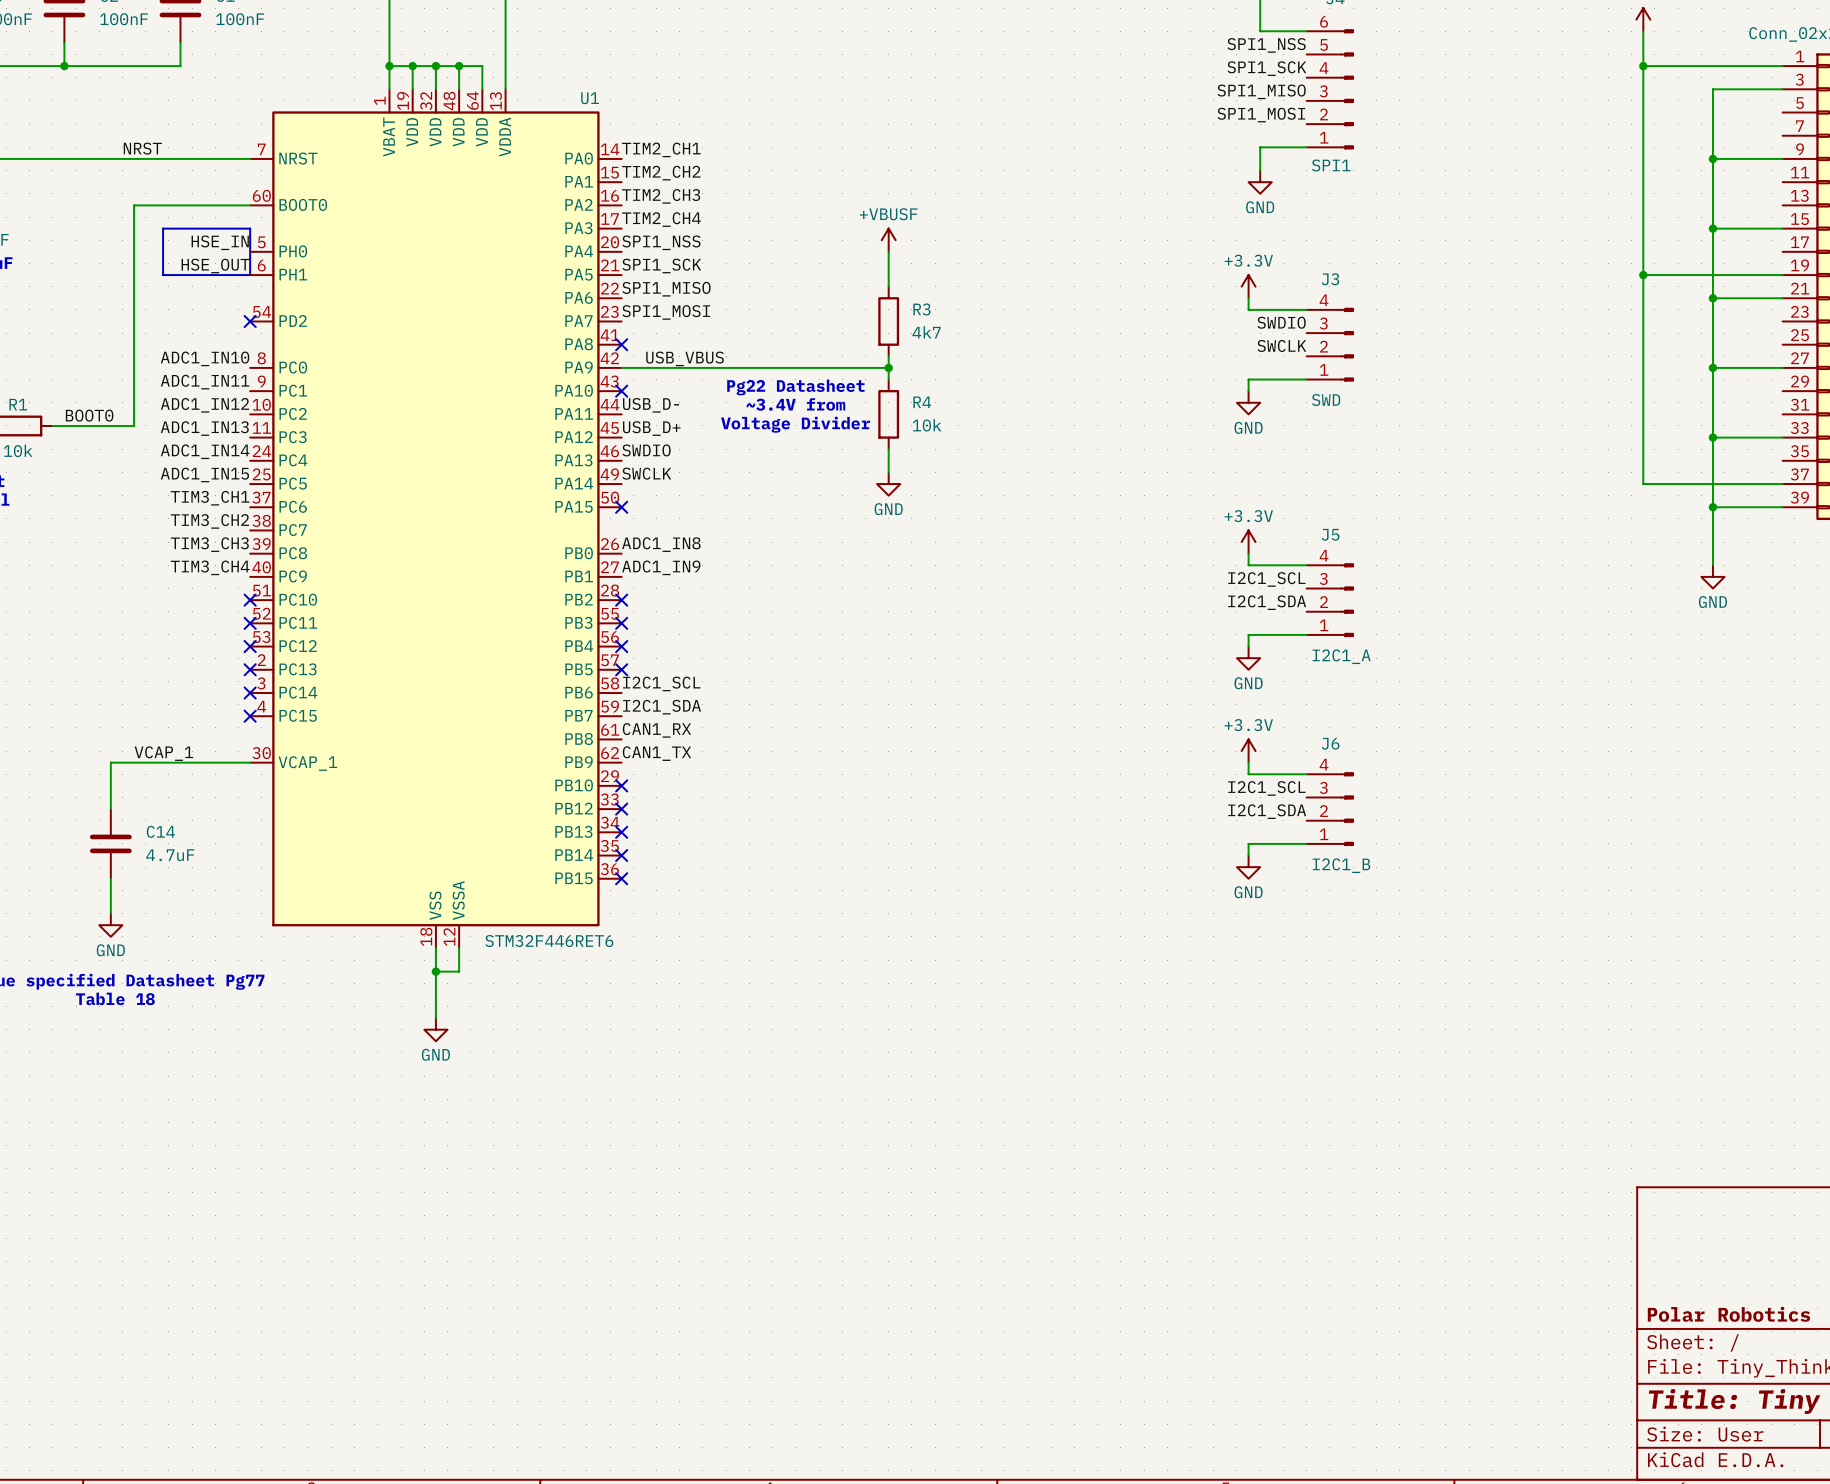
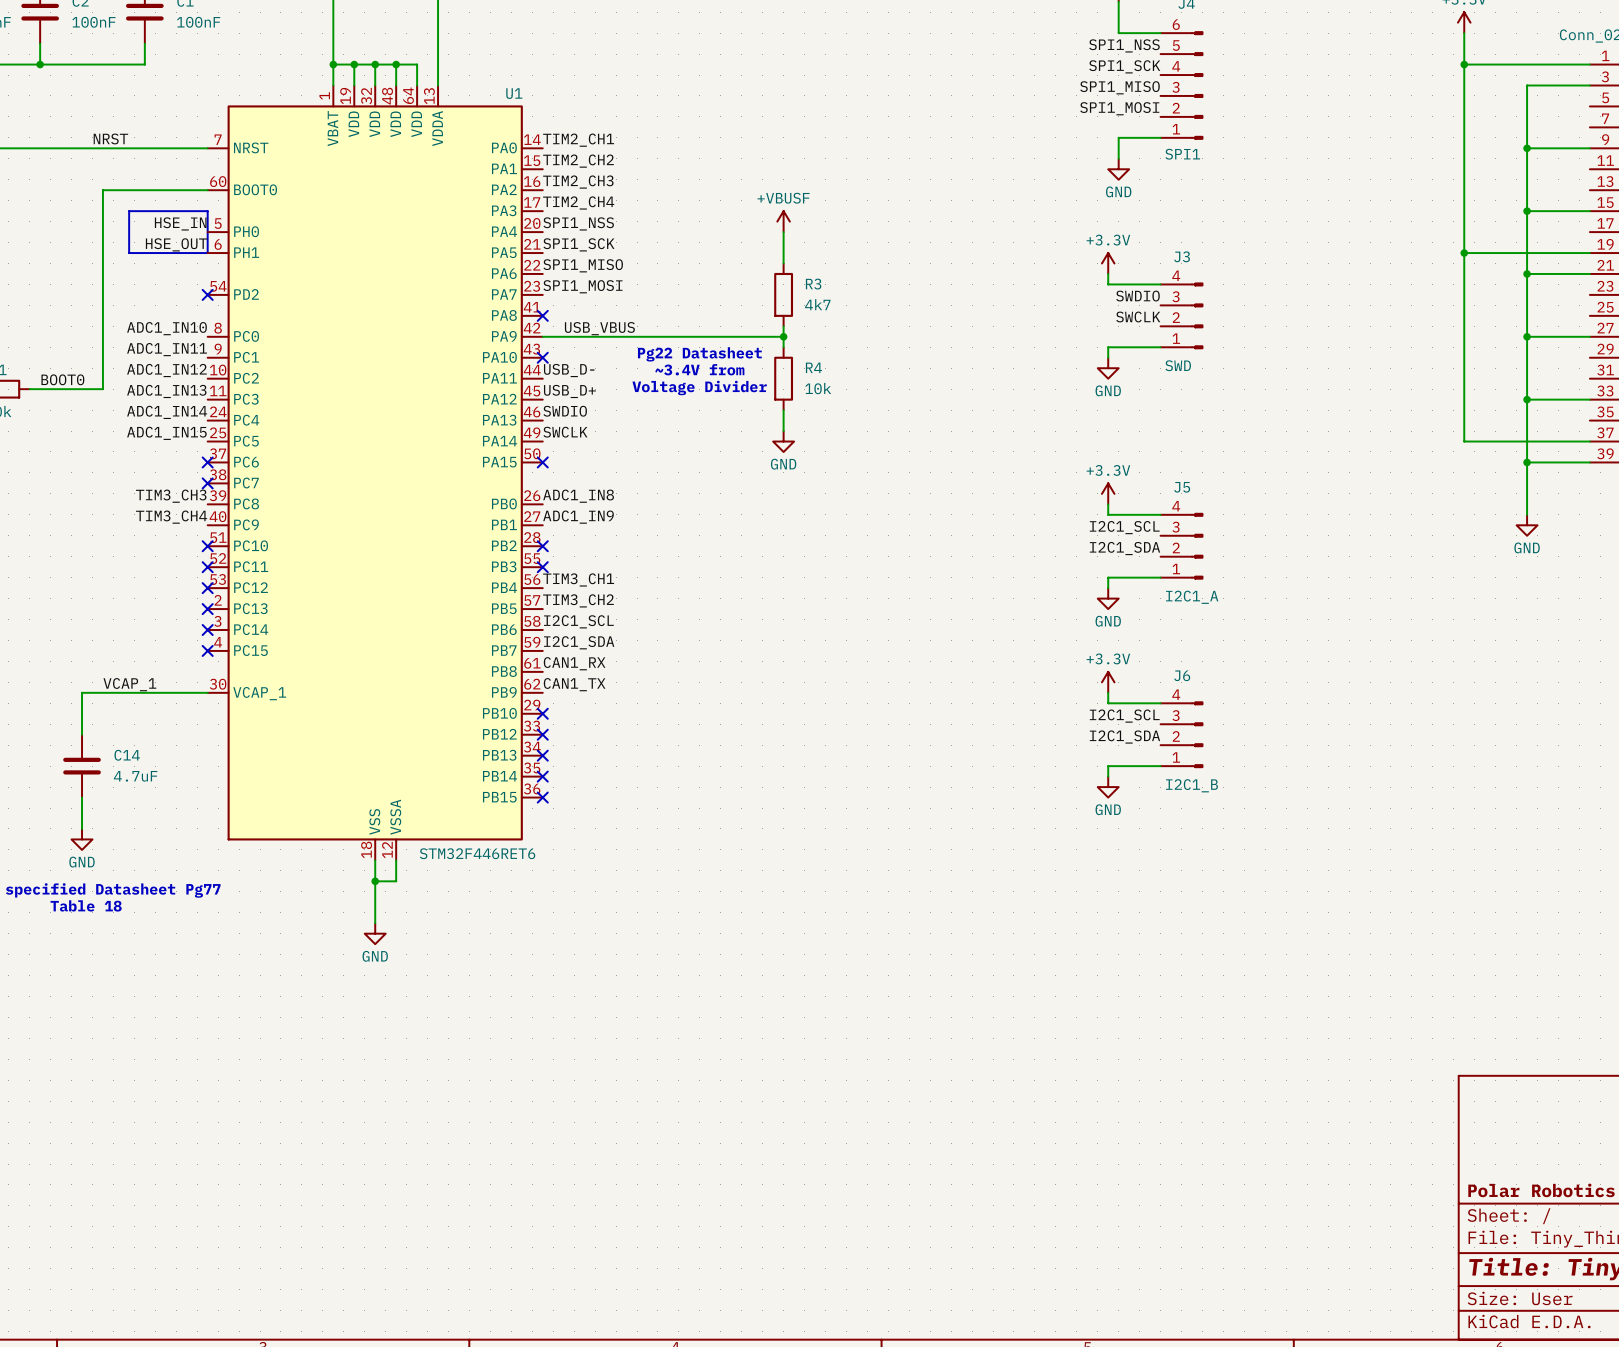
label: TIM3_CH1 (210, 498) -> none
no-connect mark: none -> (207, 462)
label: TIM3_CH2 (209, 521) -> none
no-connect mark: none -> (207, 483)
label: none -> TIM3_CH1 (578, 579)
no-connect mark: (621, 646) -> none
label: none -> TIM3_CH2 (578, 600)
no-connect mark: (621, 669) -> none

